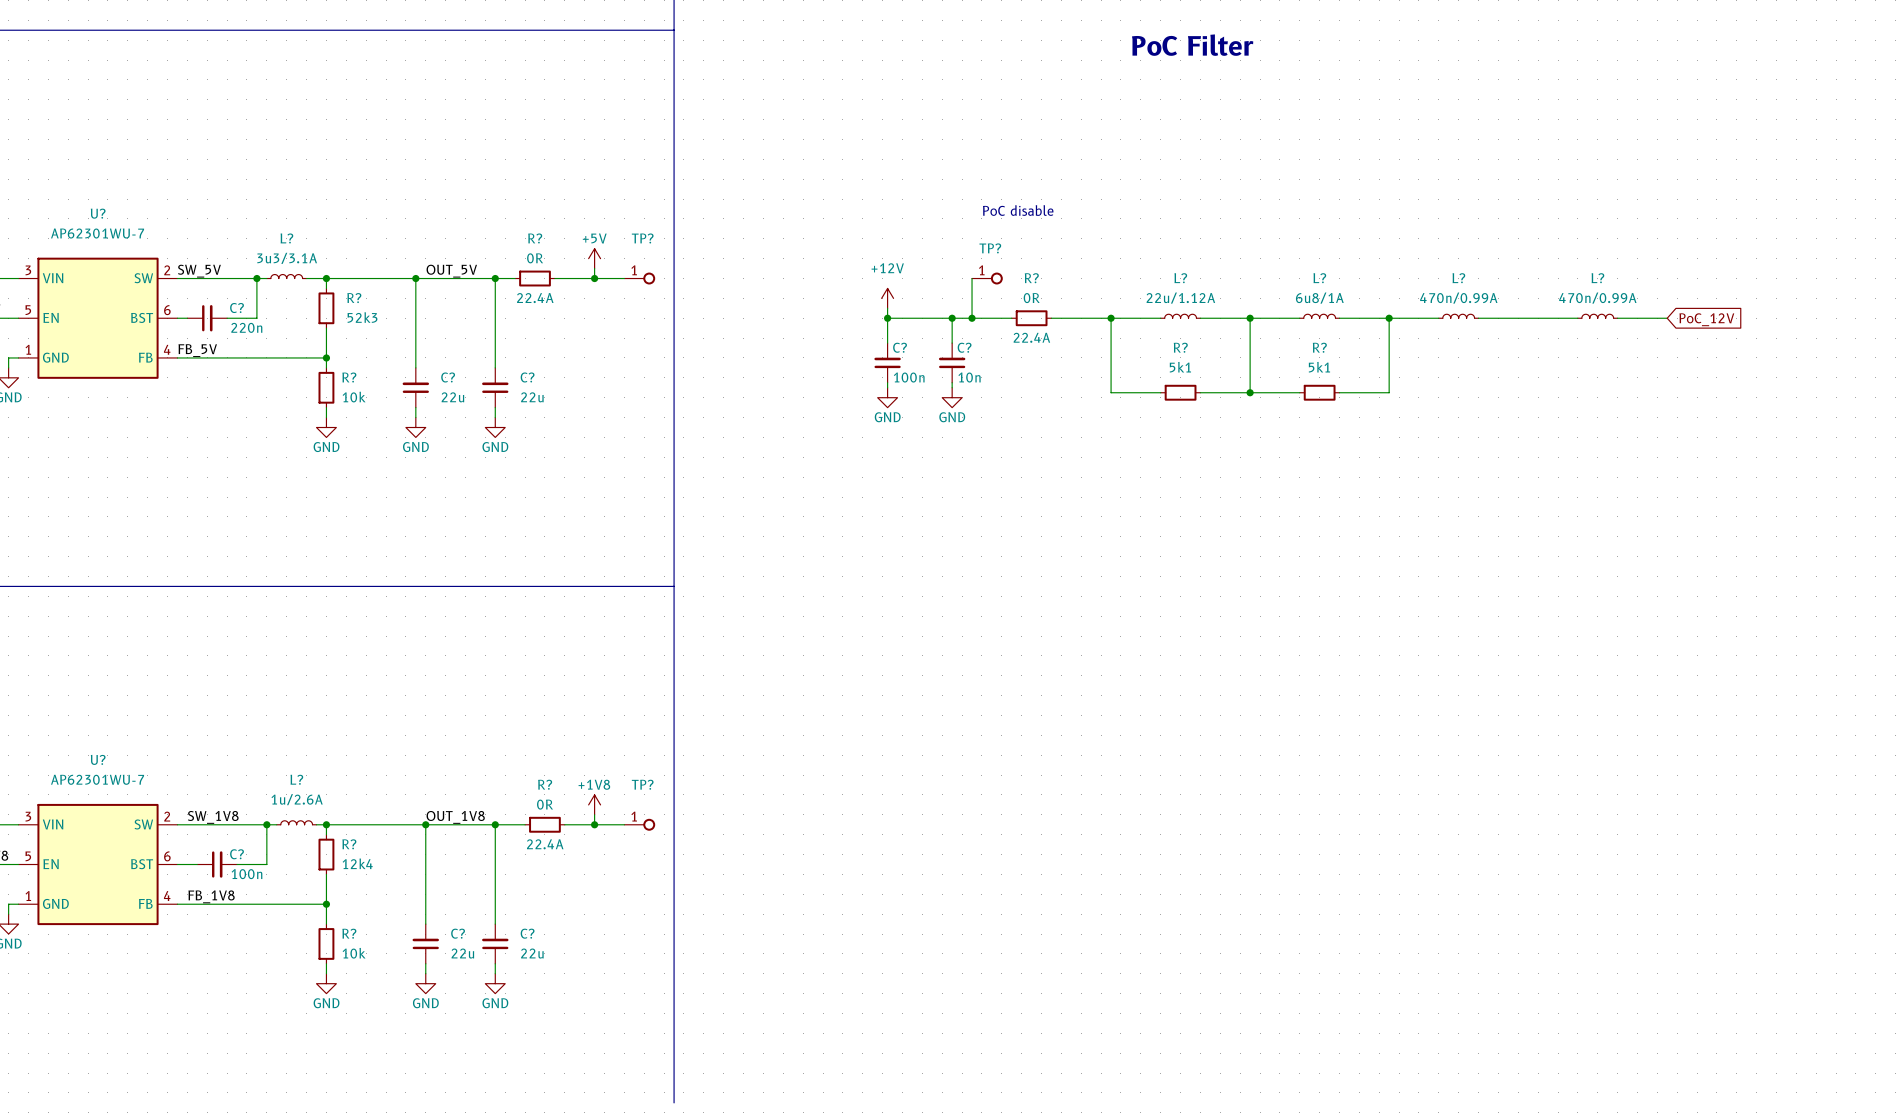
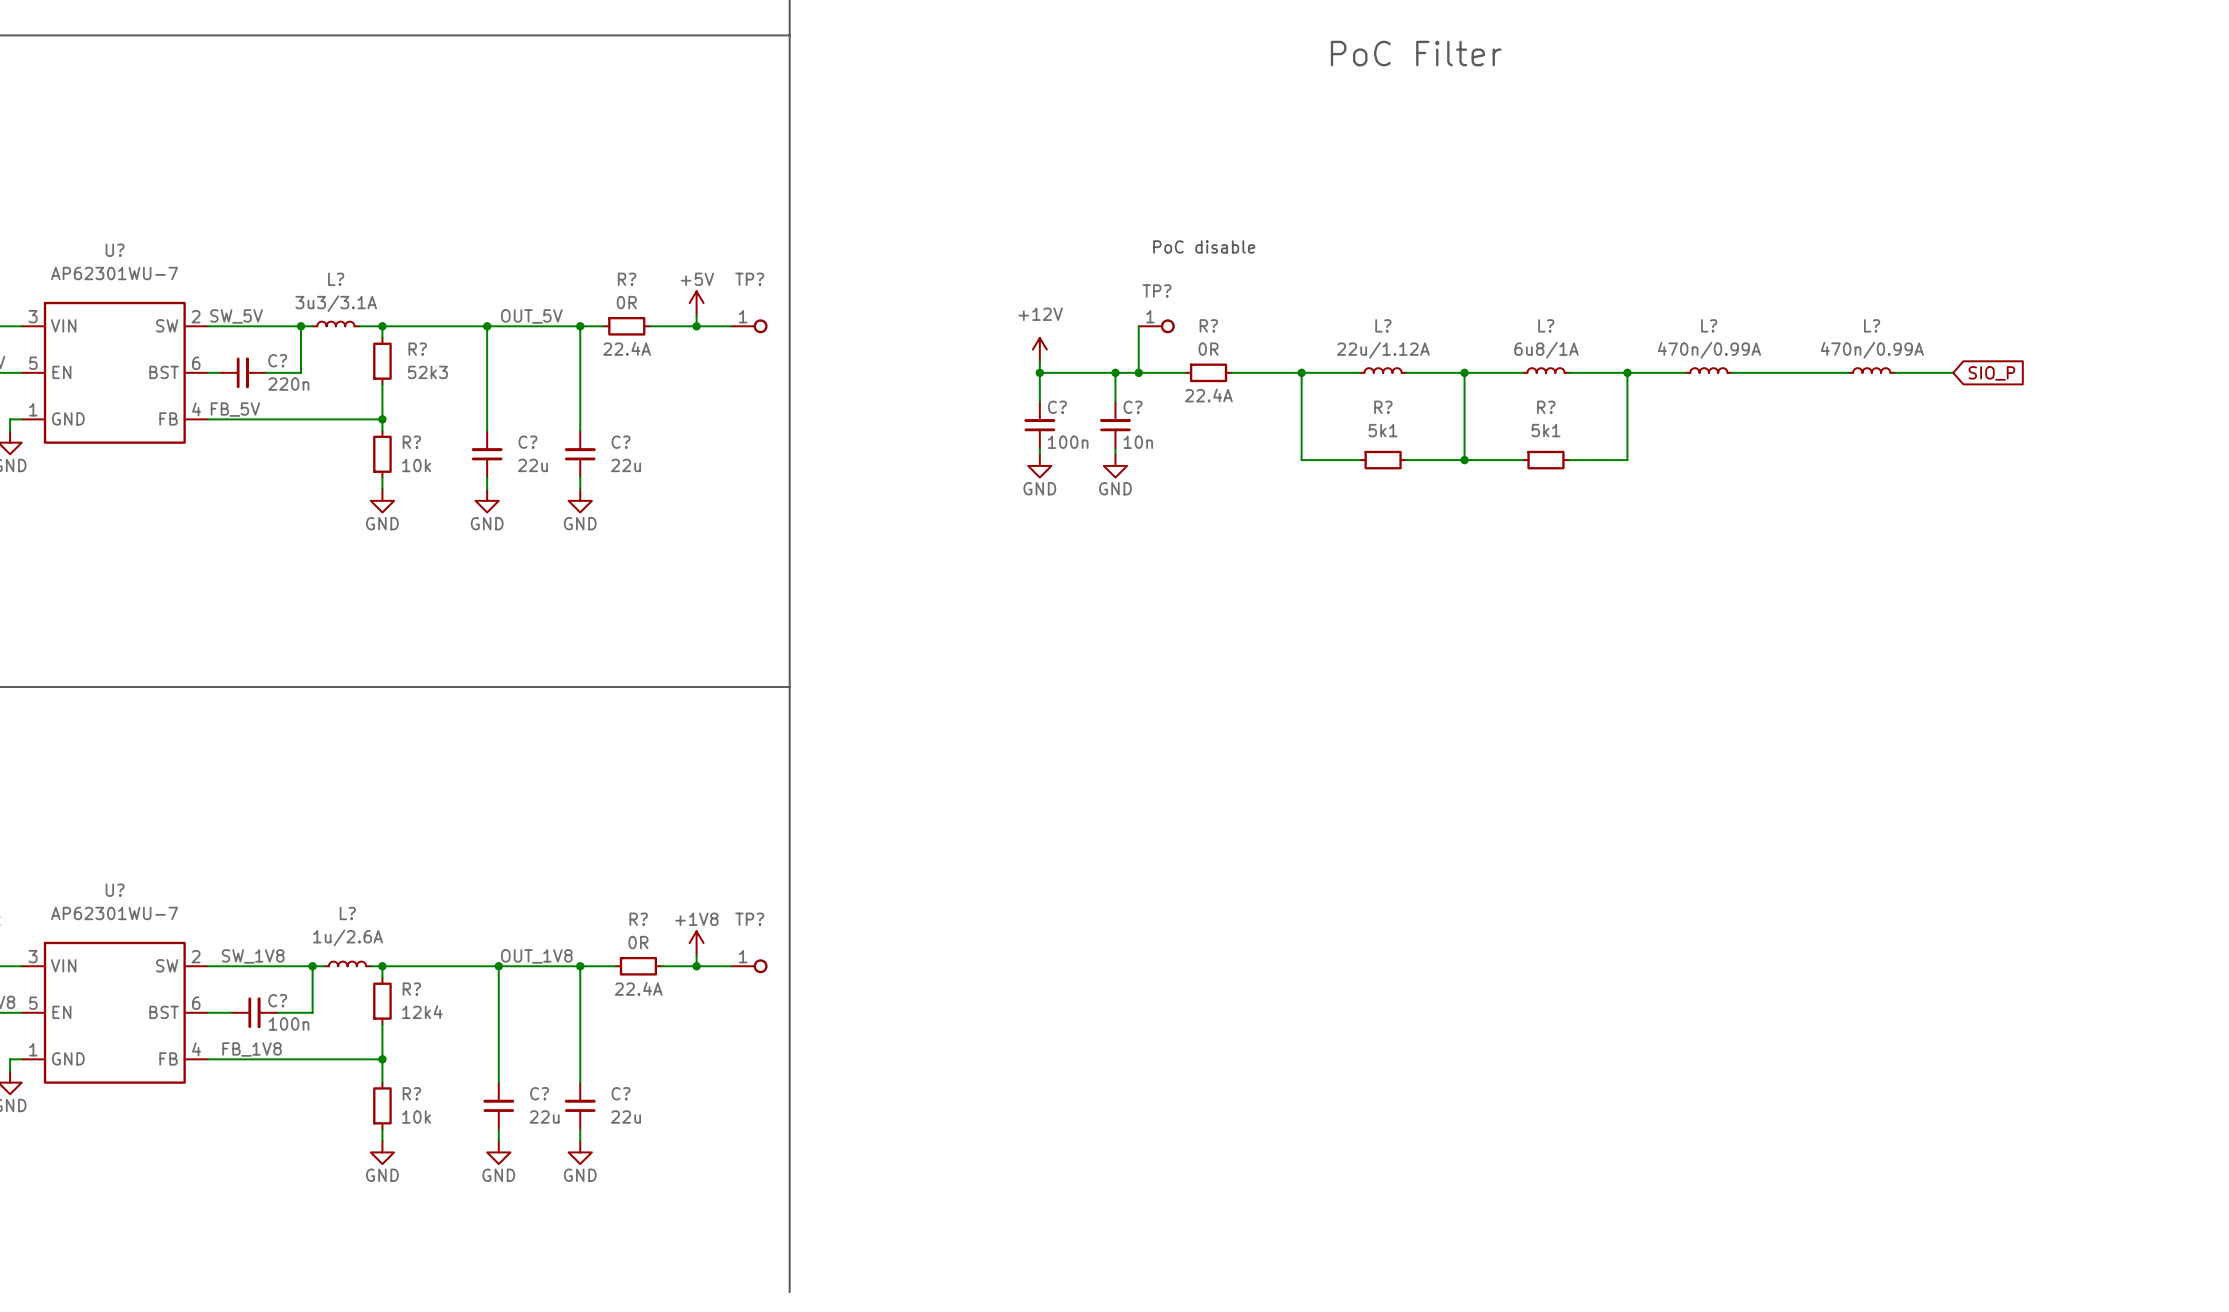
global label: PoC_12V (1706, 319) -> SIO_P (1991, 373)

